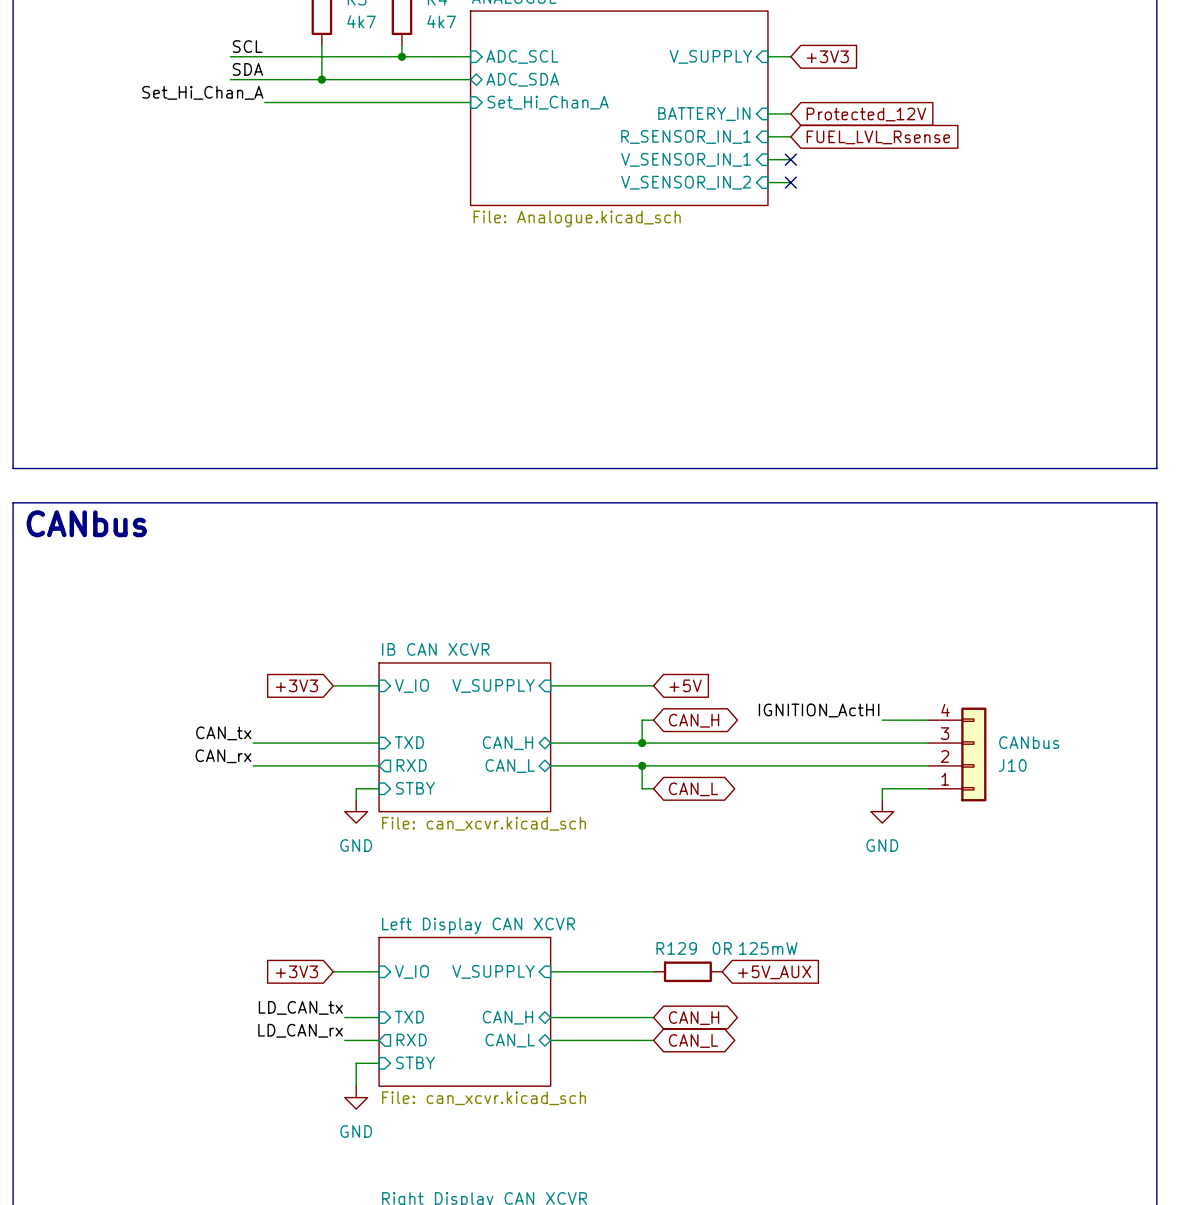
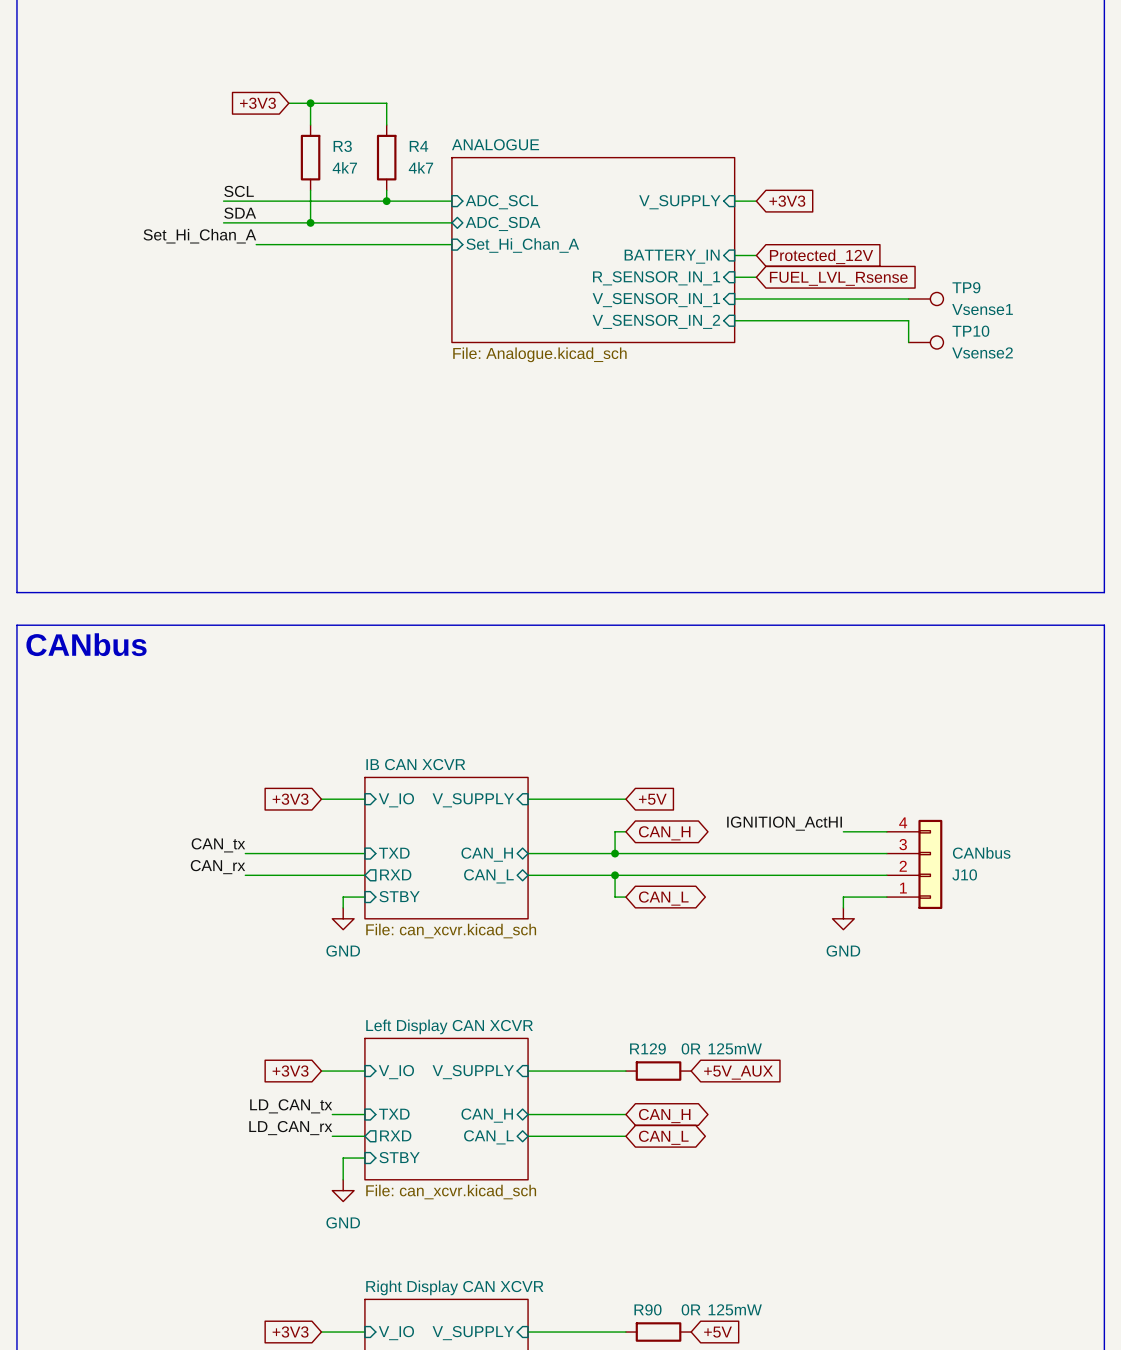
wire: none -> (756, 298) (908, 298)
no-connect mark: (790, 159) -> none
TP9: none -> Vsense1 (926, 298)
wire: none -> (756, 320) (908, 320) (908, 342)
no-connect mark: (790, 182) -> none
TP10: none -> Vsense2 (926, 342)

